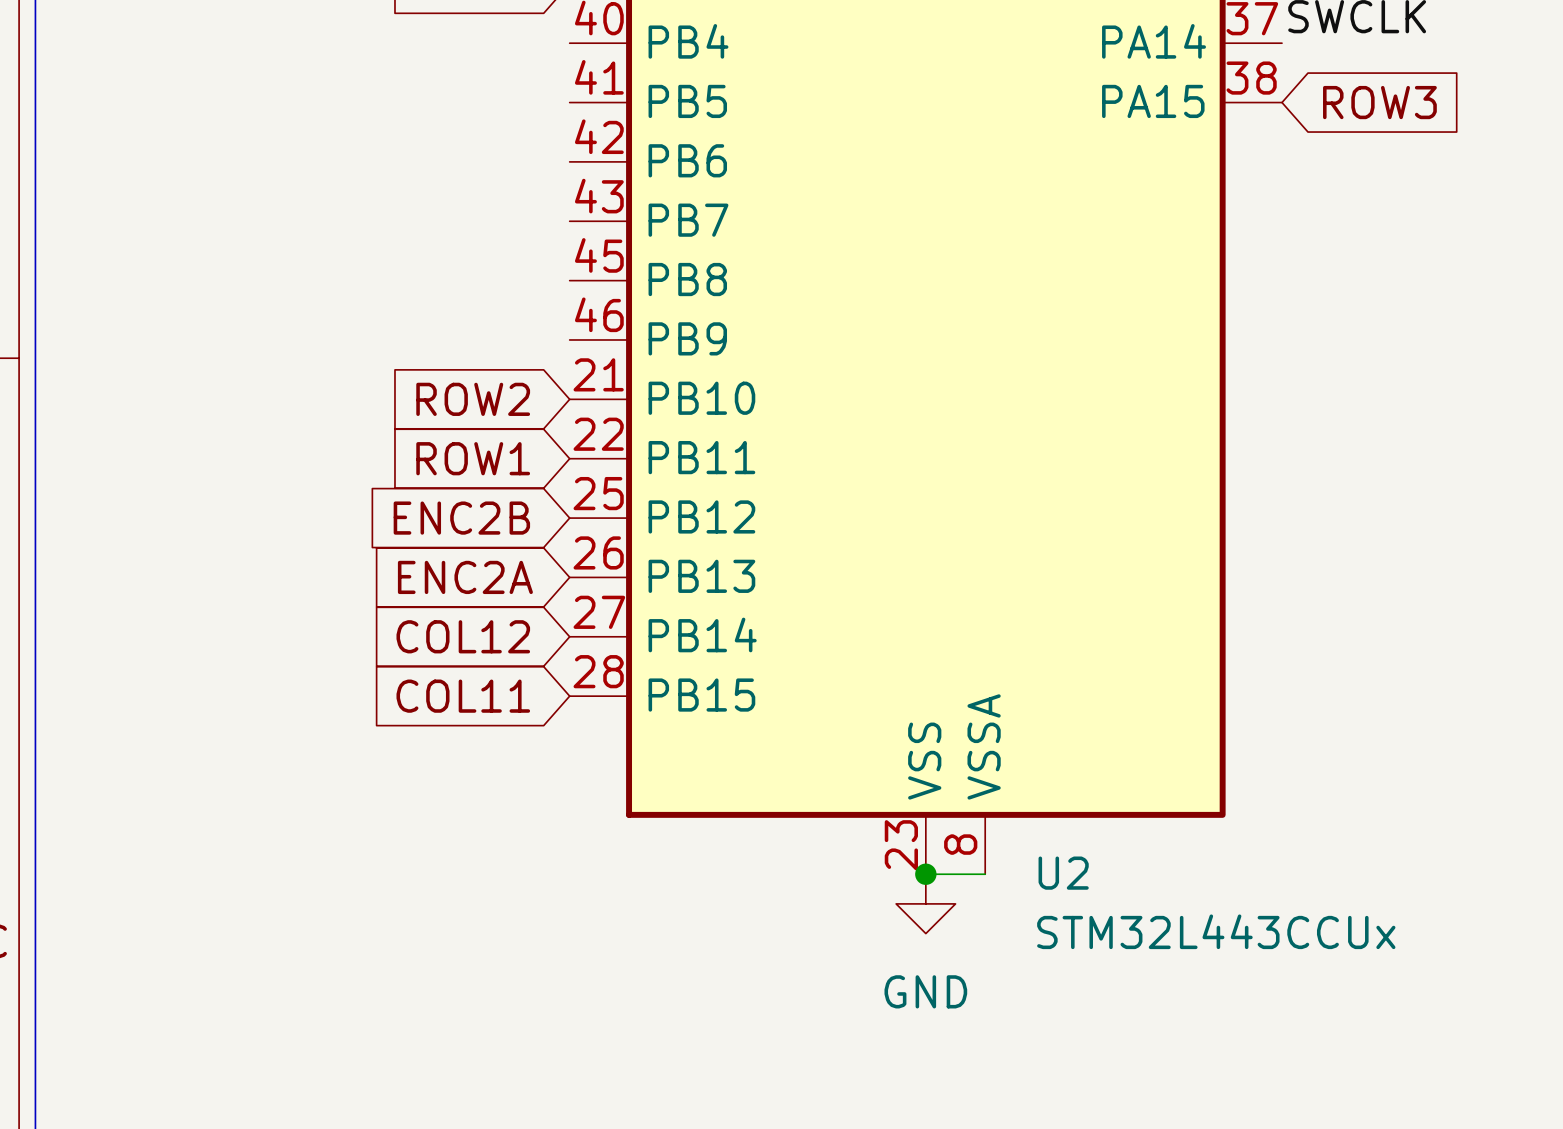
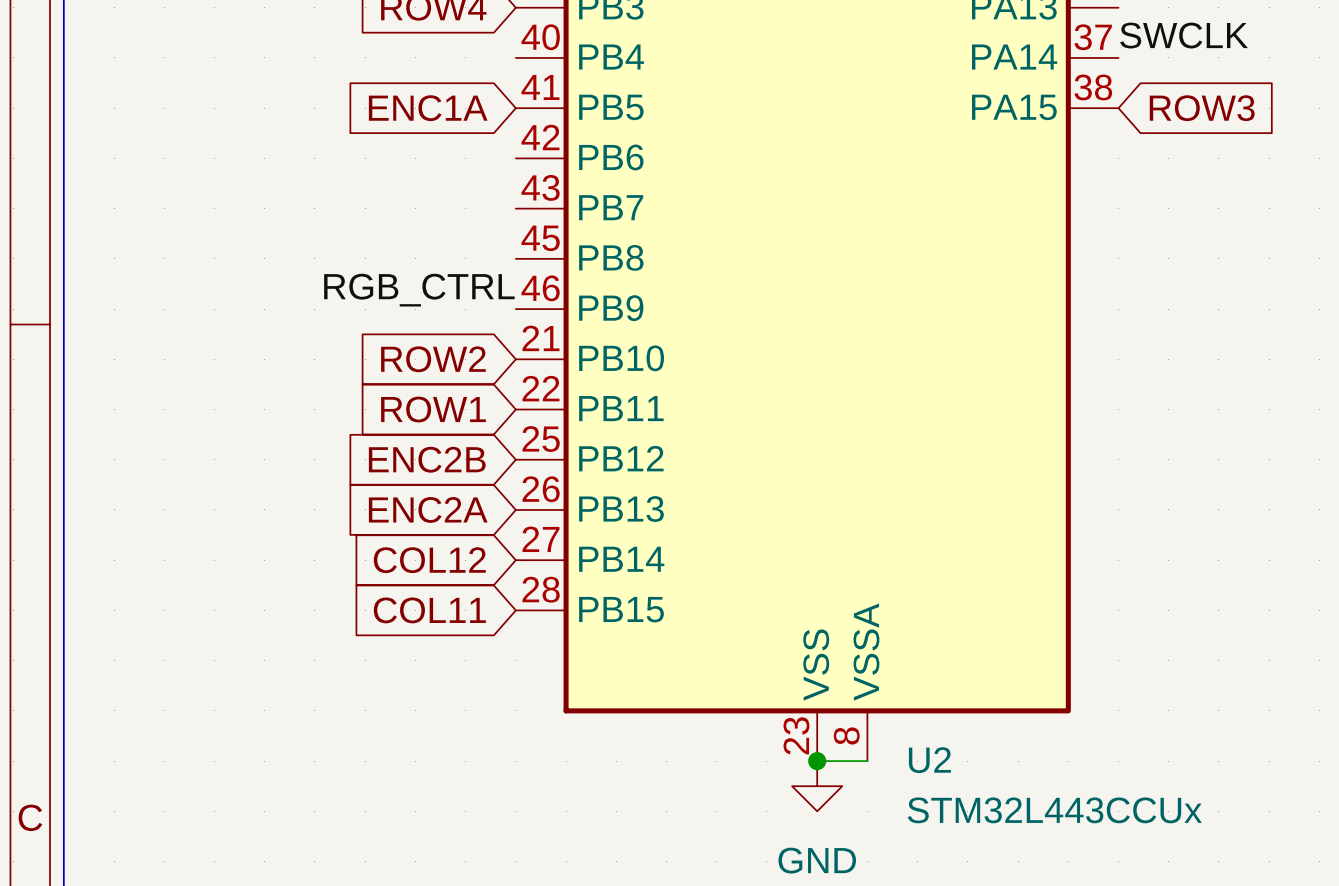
global label: none -> ENC1A (428, 108)
label: none -> RGB_CTRL (419, 290)

